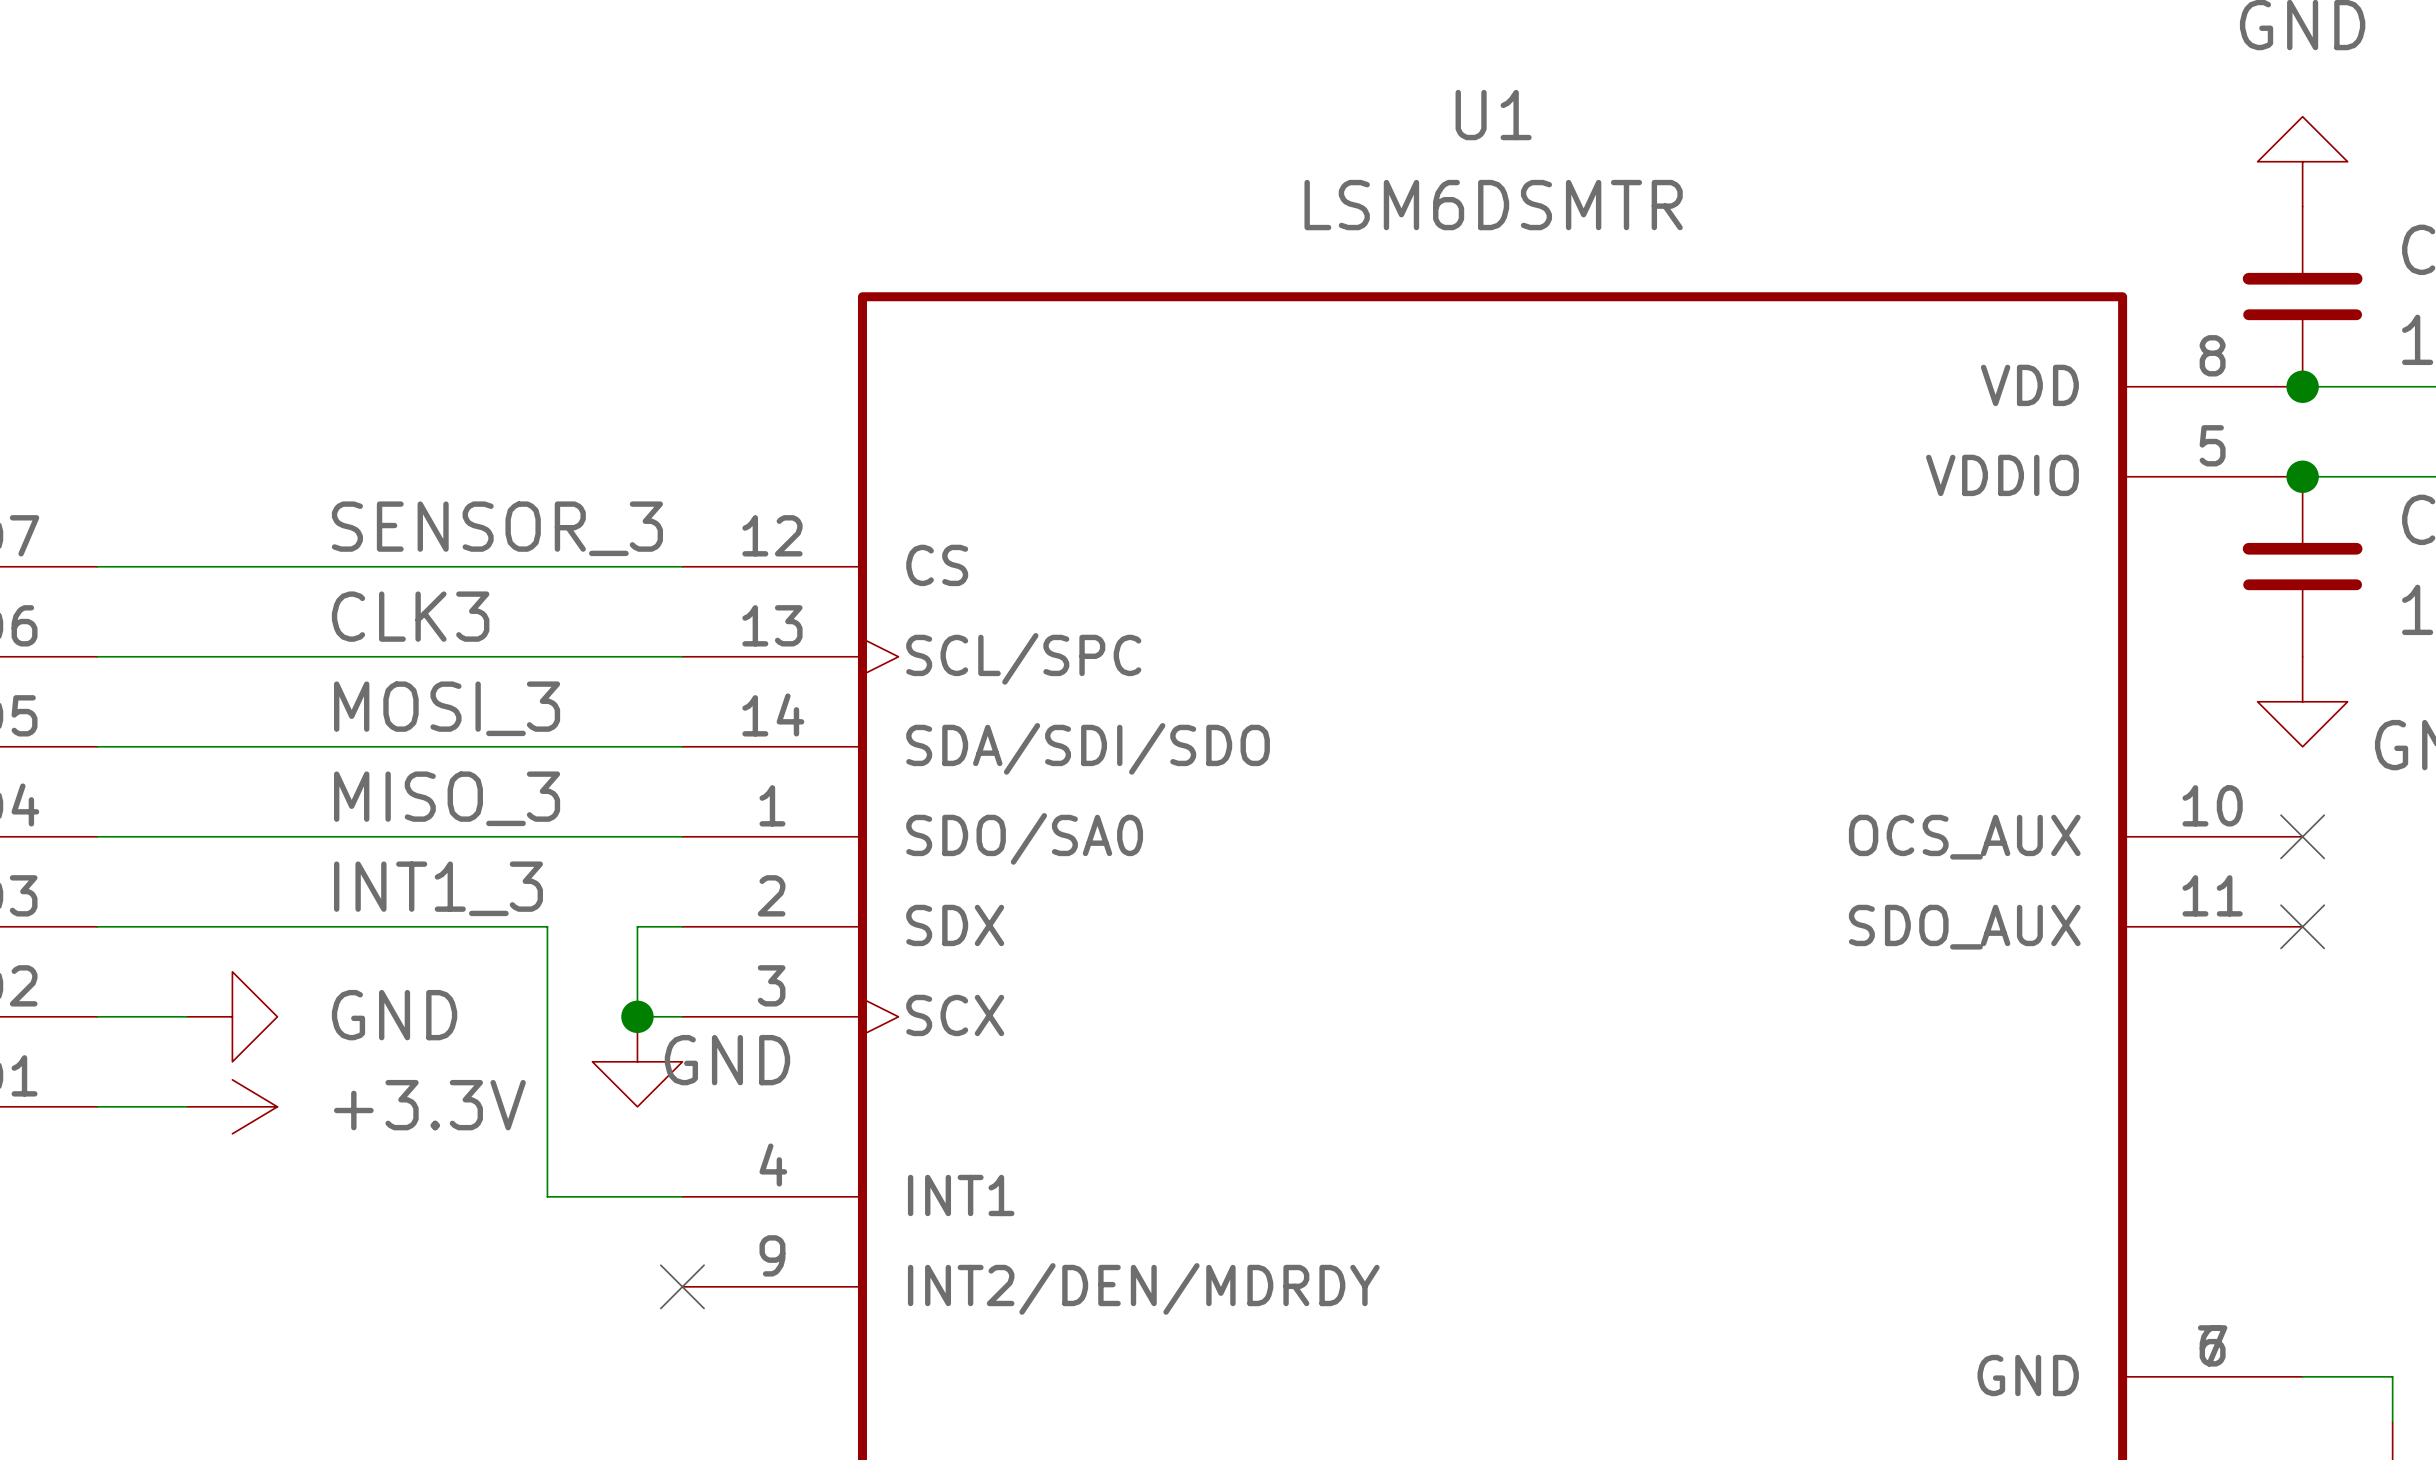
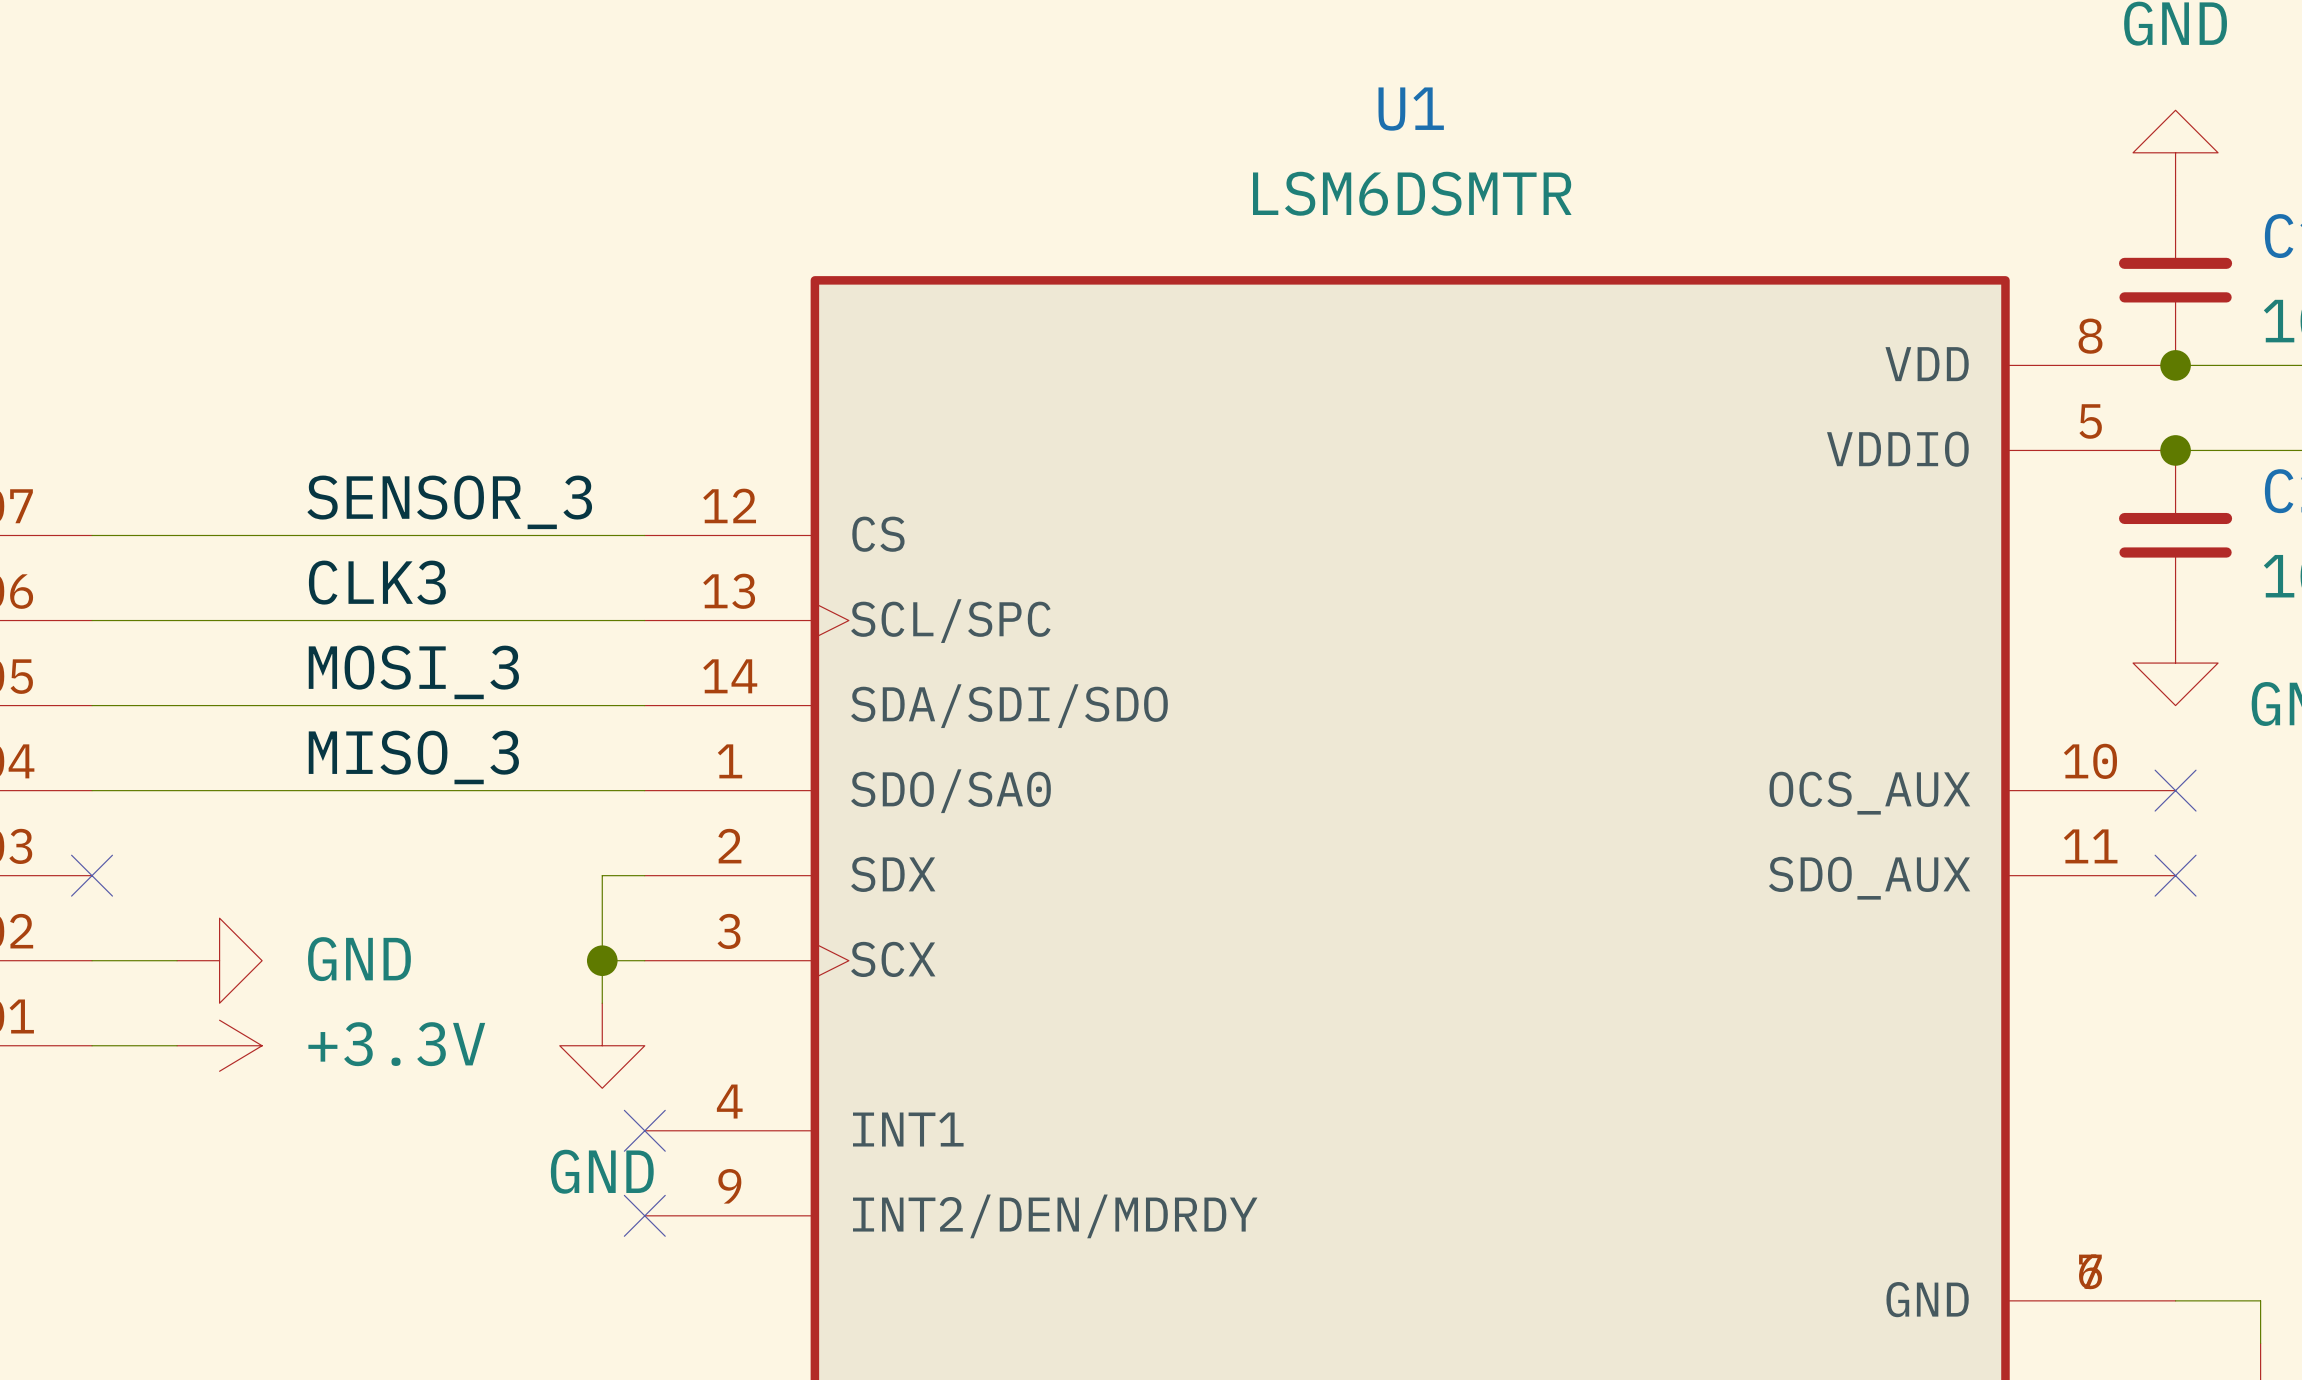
label: INT1_3 (438, 888) -> none
wire: (97, 926) (547, 926) (547, 1196) (682, 1196) -> none
no-connect mark: none -> (92, 875)
power symbol text position: GND (727, 1060) -> GND (602, 1171)
power symbol position: GND (637, 1061) -> GND (602, 1045)
no-connect mark: none -> (644, 1130)

